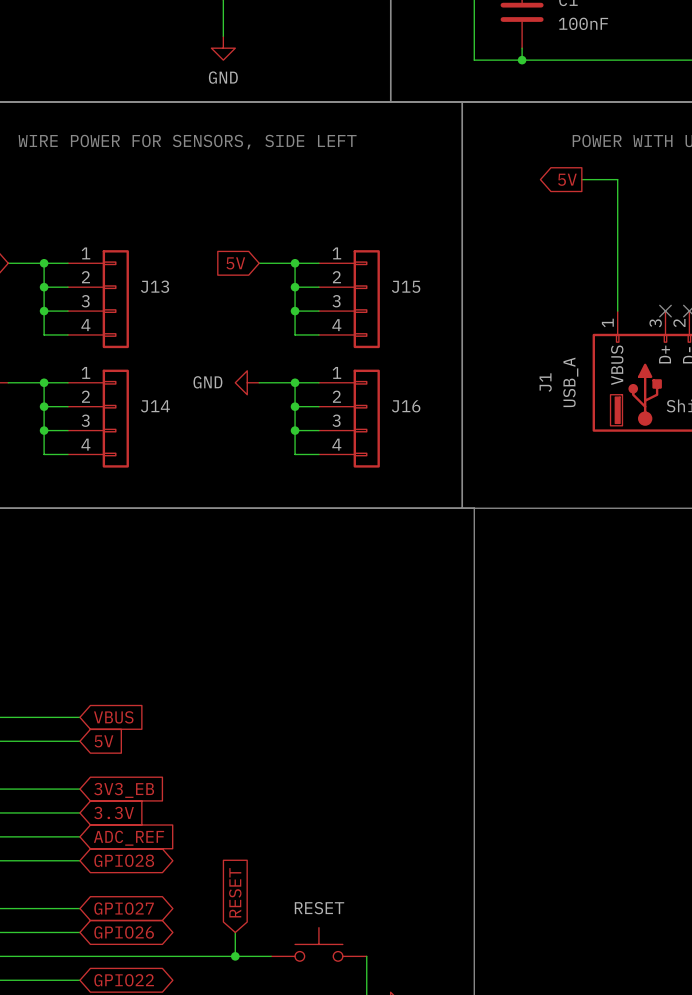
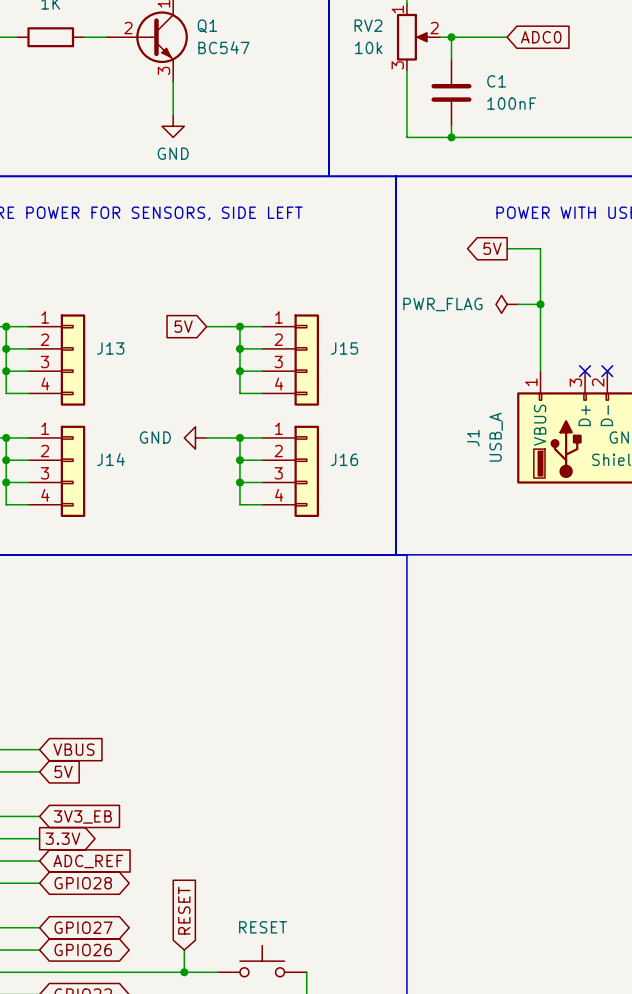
power symbol: none -> PWR_FLAG (507, 304)
wire: none -> (518, 304) (540, 304)
junction: none -> (540, 304)
global label shape: input (114, 812) -> output (62, 838)

